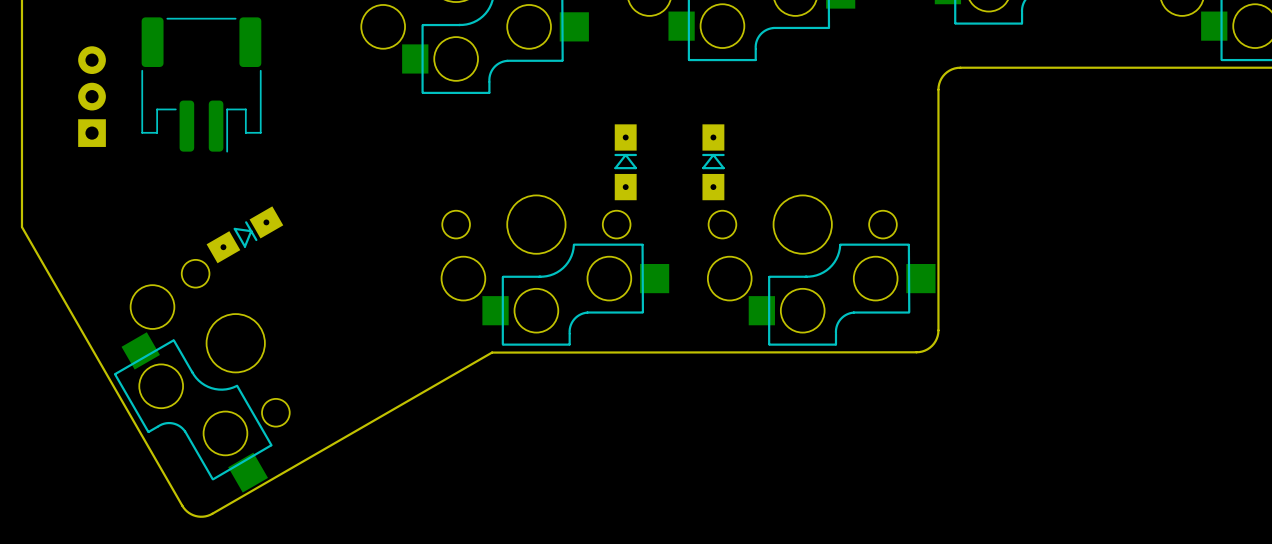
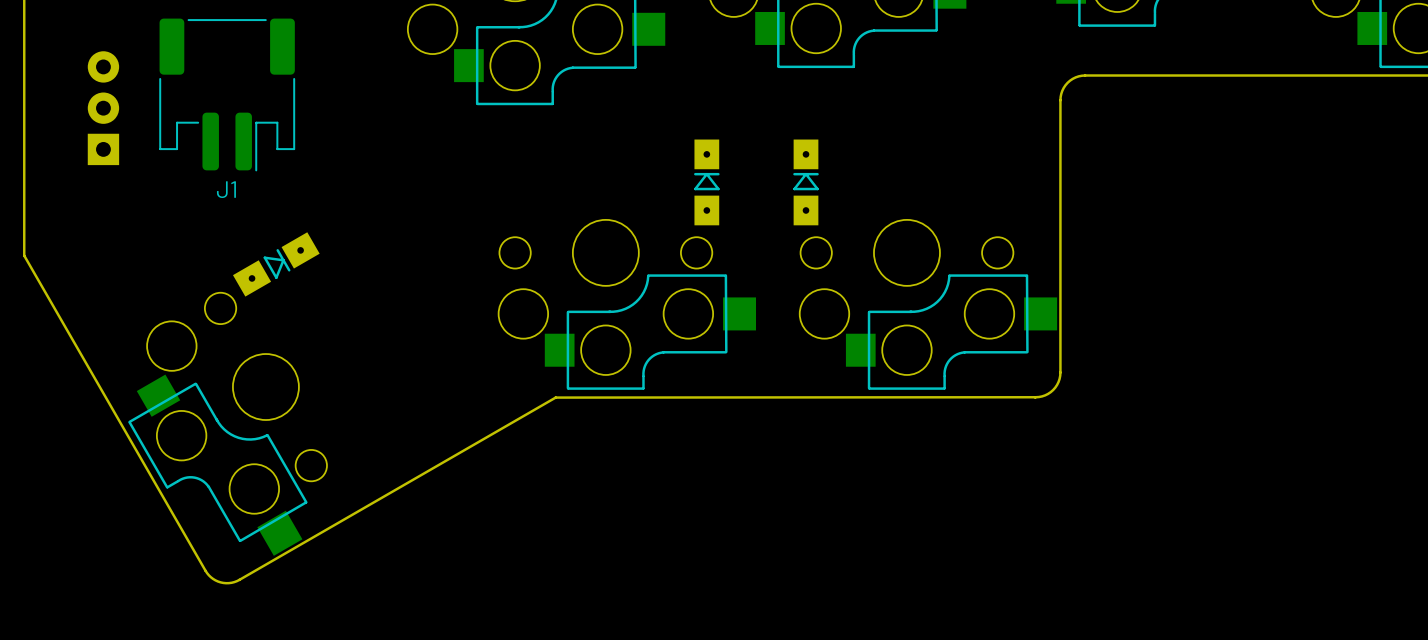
J1 name: none -> J1 (226, 189)

